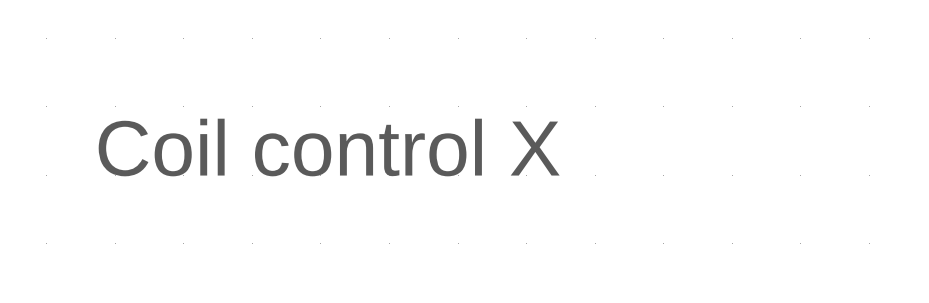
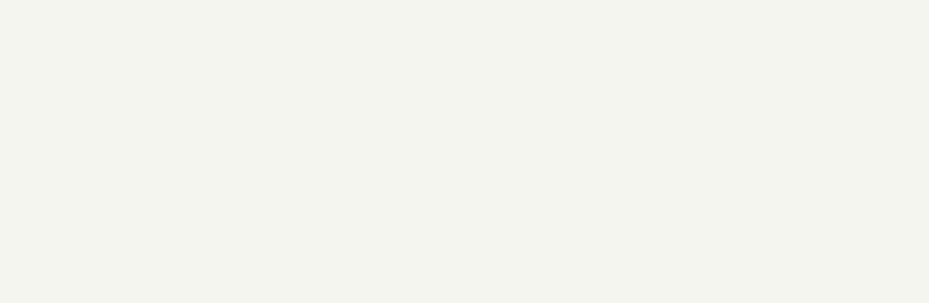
text: Coil control X (329, 147) -> none

